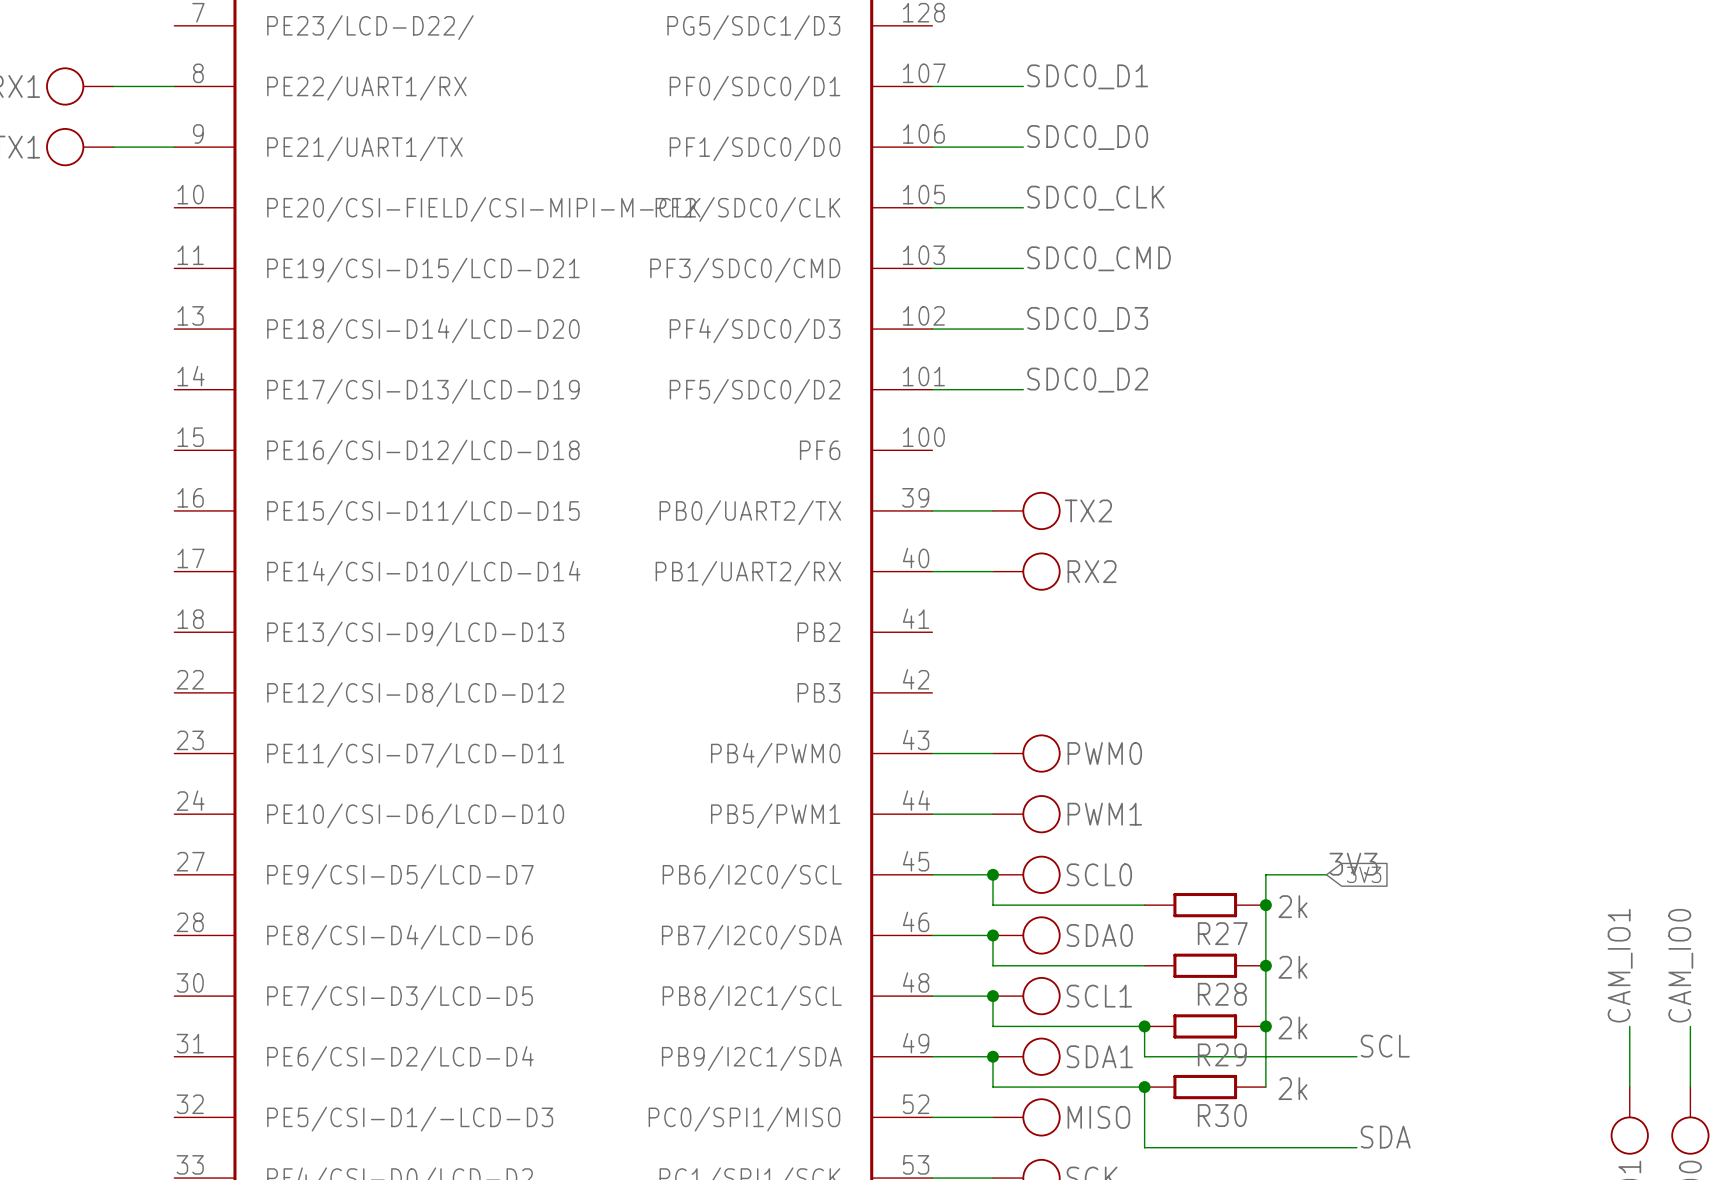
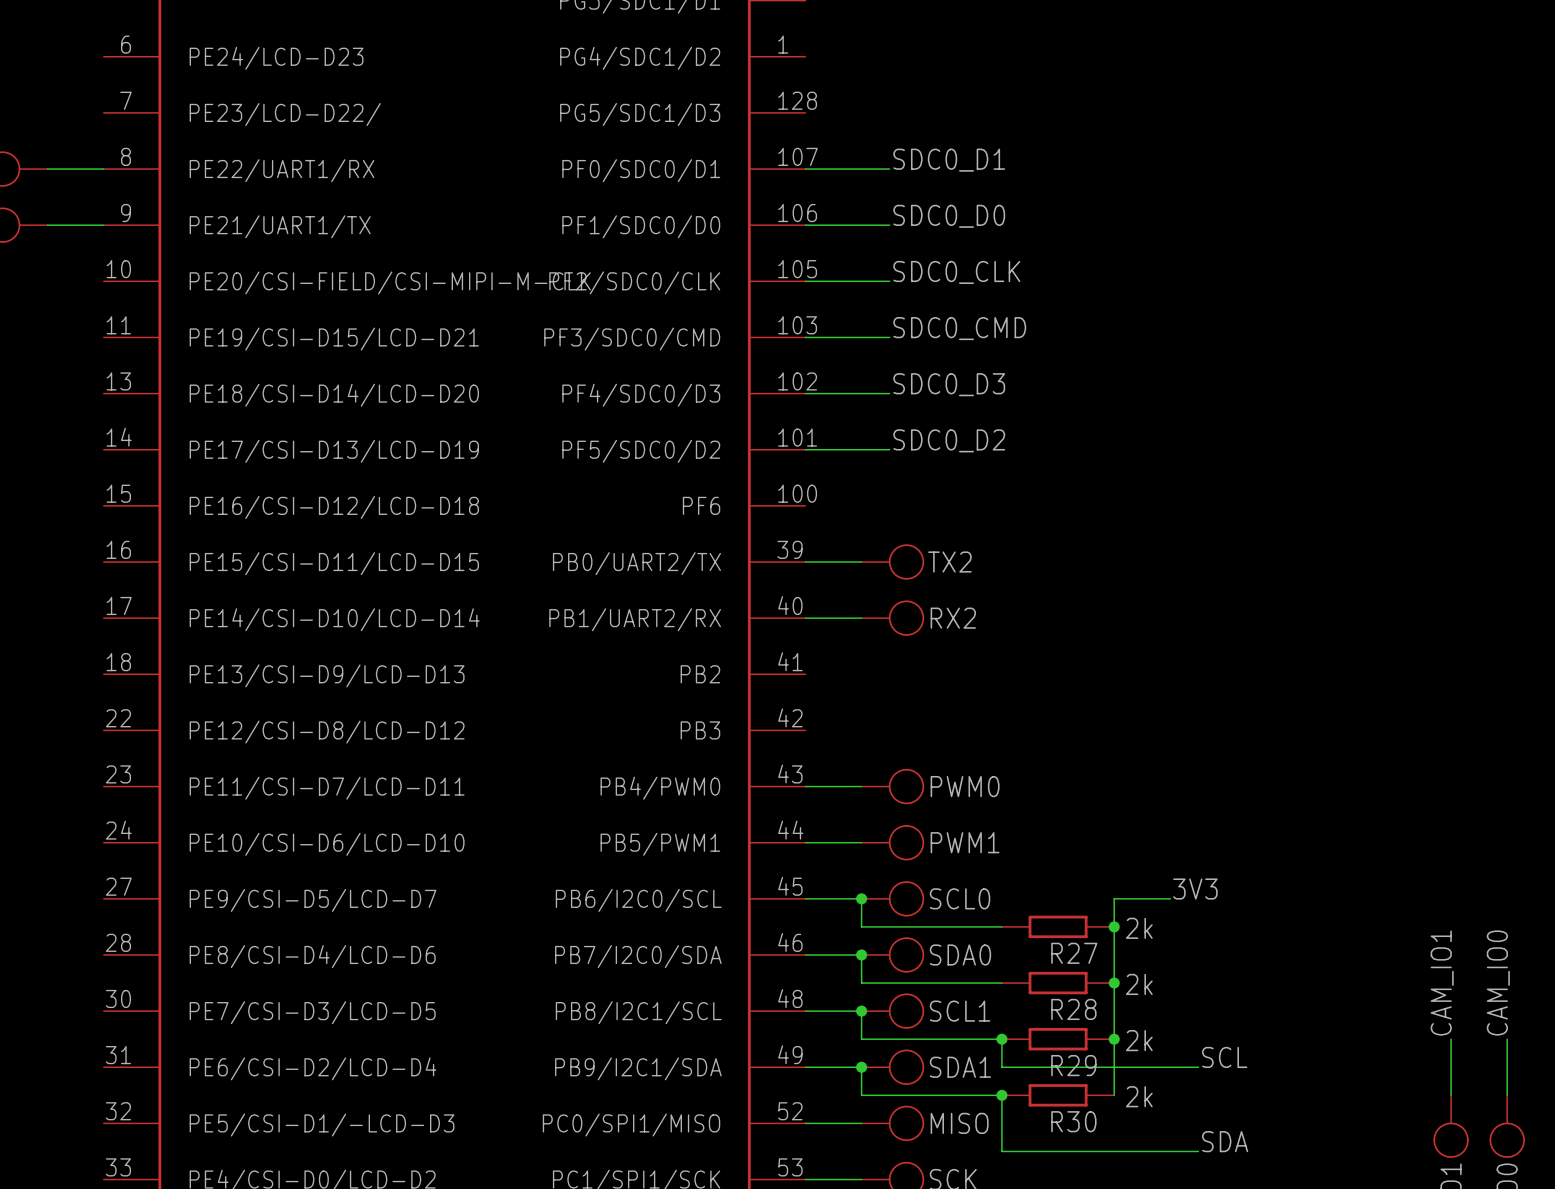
global label: 3V3 (1364, 874) -> none

